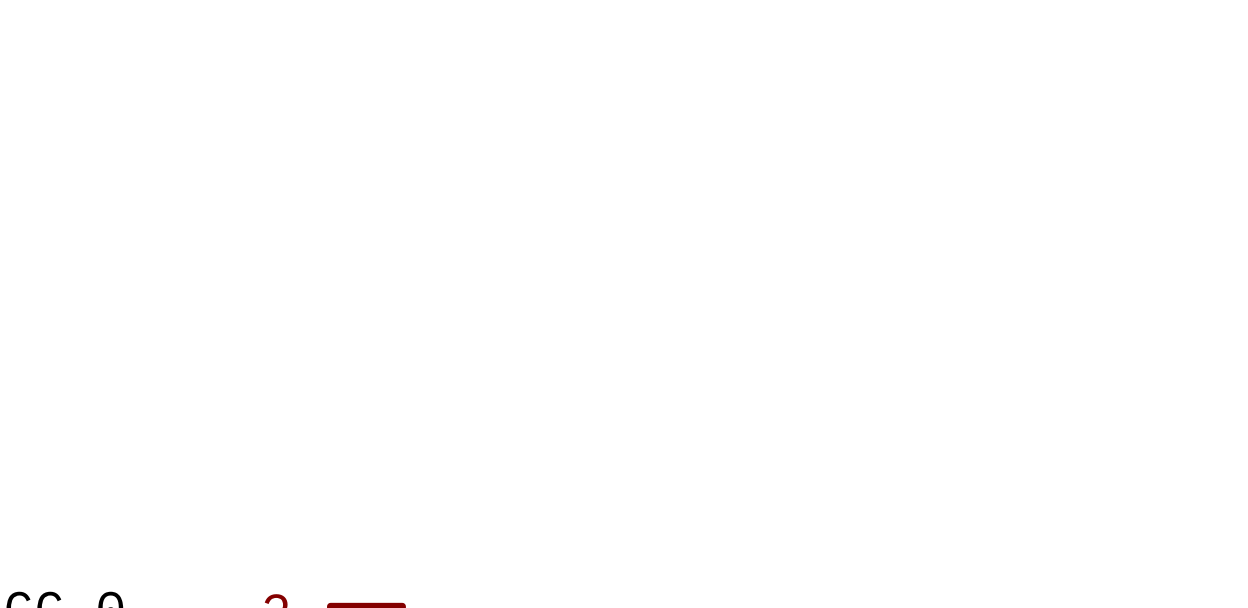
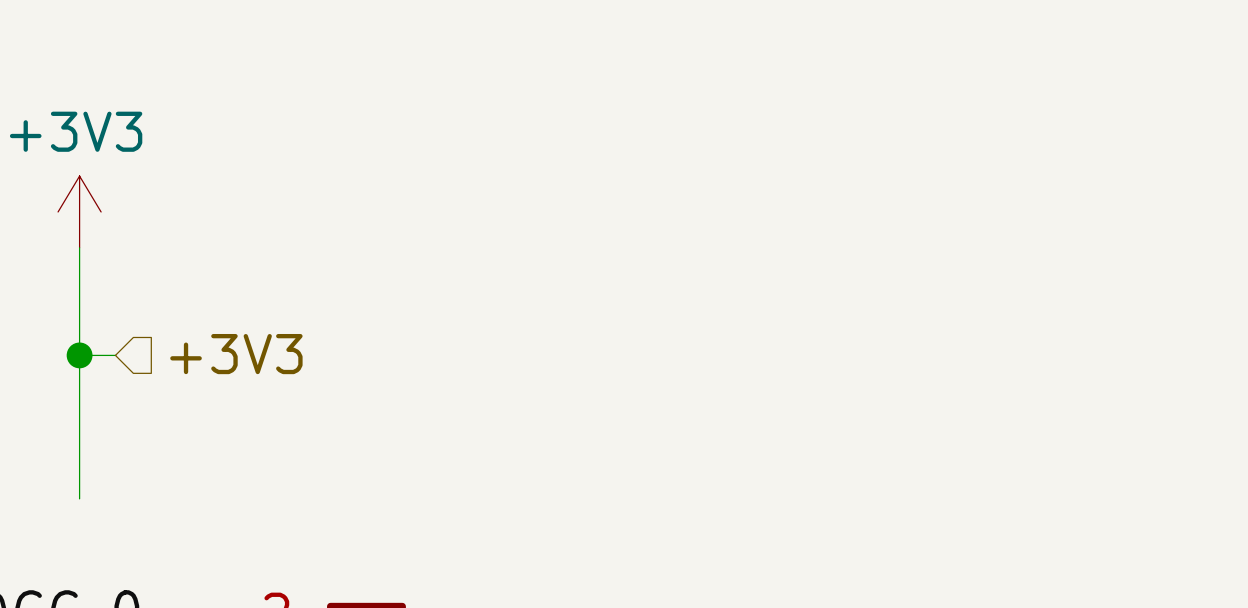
power symbol: none -> +3V3 (79, 211)
wire: none -> (79, 247) (79, 498)
hierarchical label: none -> +3V3 (236, 354)
wire: none -> (79, 355) (115, 355)
junction: none -> (79, 355)

